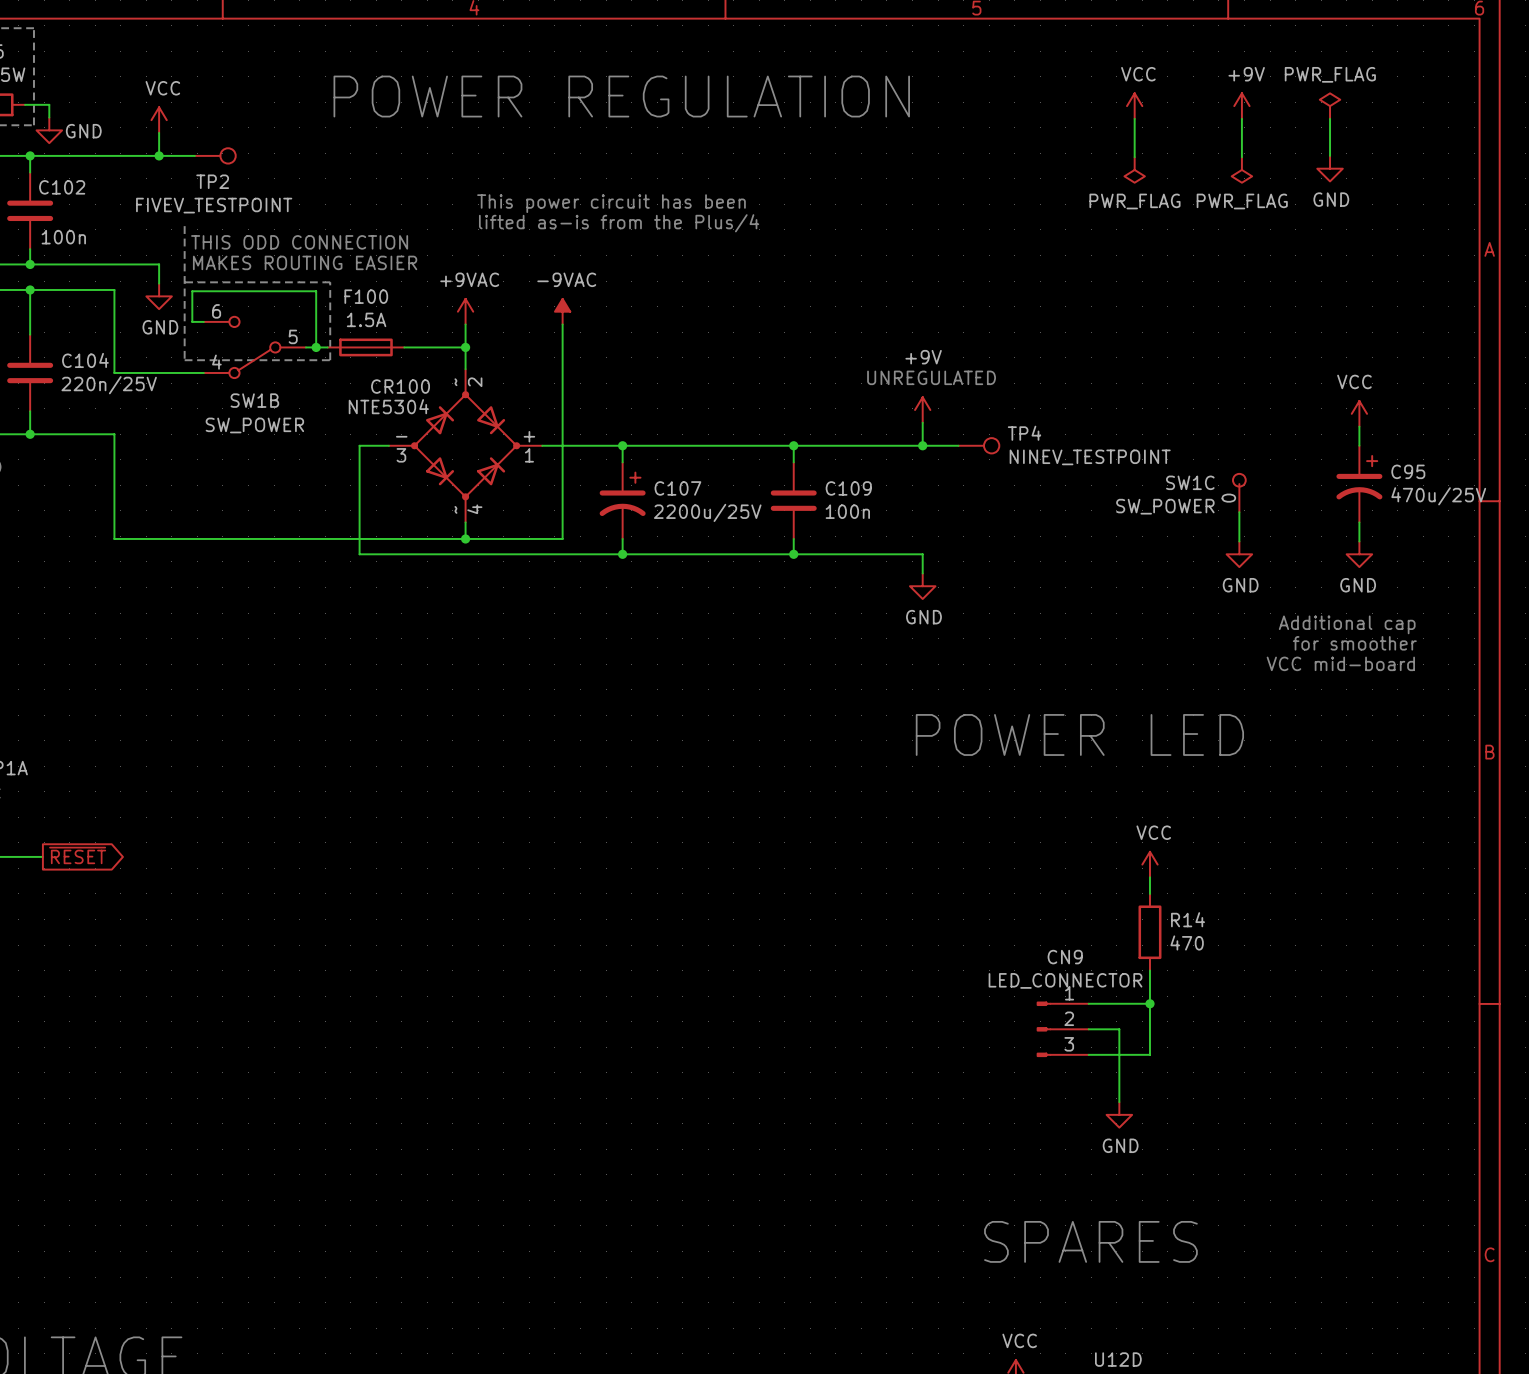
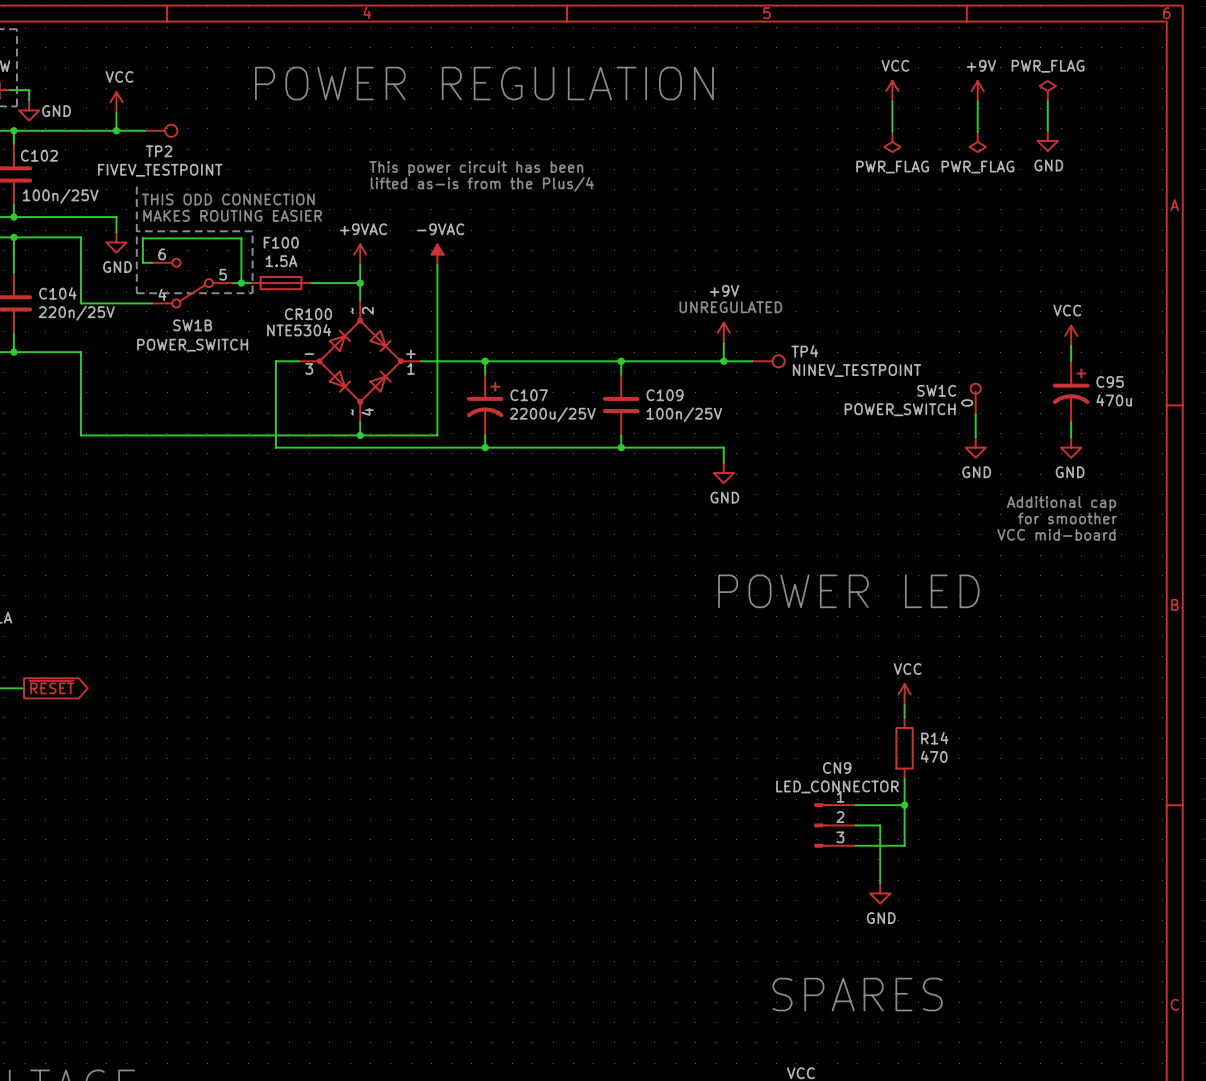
C102 value: 100n (63, 237) -> 100n/25V (60, 196)
SW1B value: SW_POWER (254, 425) -> POWER_SWITCH (192, 345)
C95 value: 470u/25V (1438, 496) -> 470u (1114, 400)
SW1C value: SW_POWER (1165, 506) -> POWER_SWITCH (900, 409)
C109 value: 100n (847, 511) -> 100n/25V (684, 414)

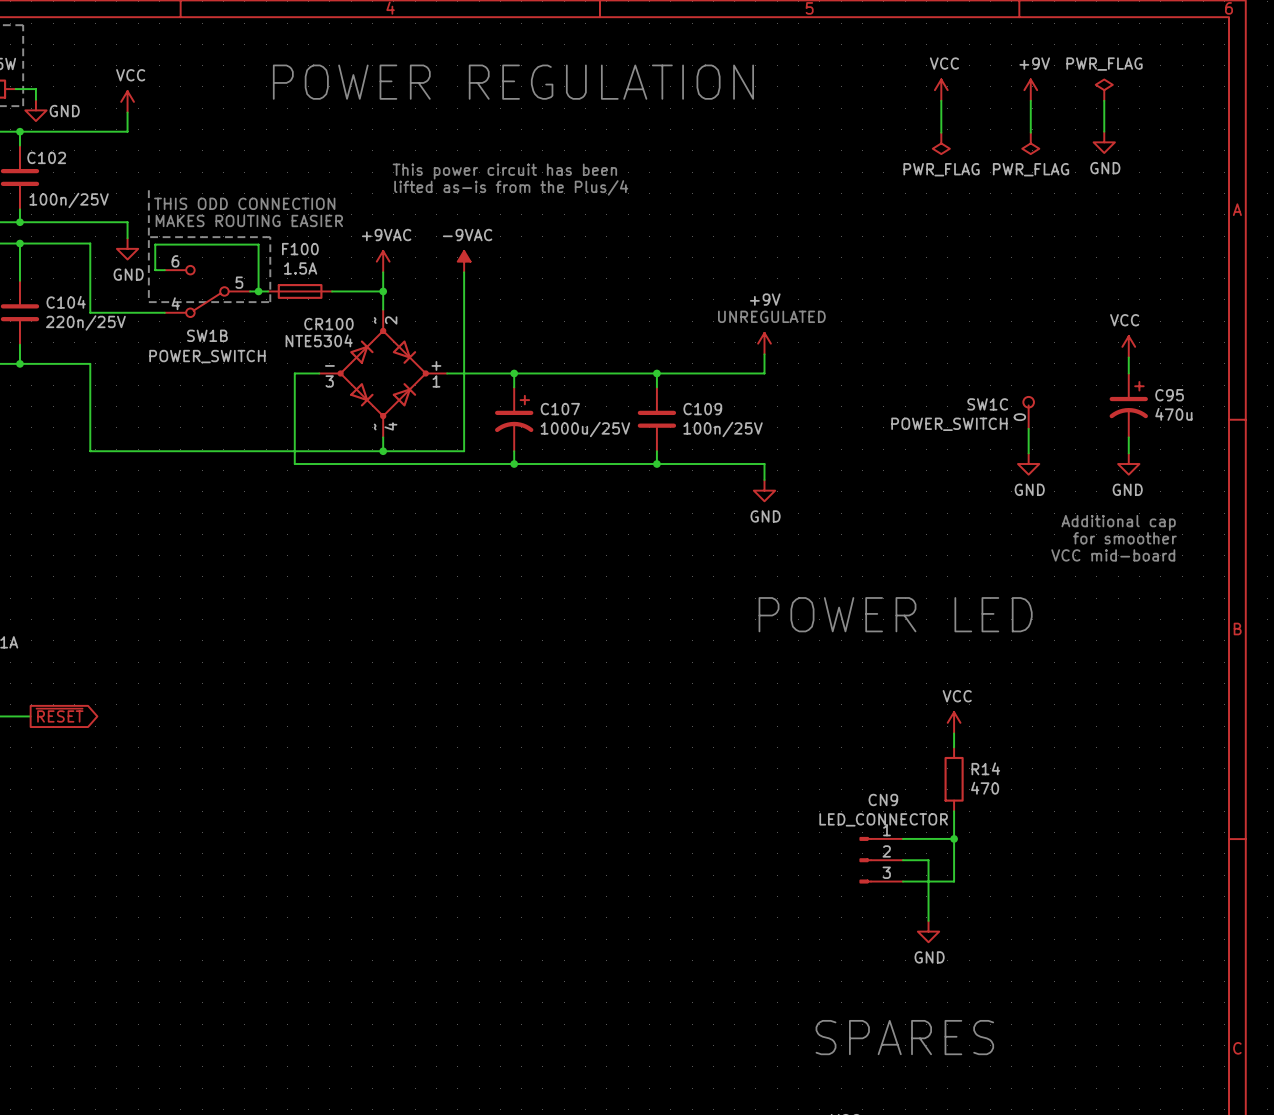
wire: (116, 130) (144, 130) -> none
junction: (116, 130) -> none
TP2: FIVEV_TESTPOINT (161, 130) -> none
wire: (723, 361) (752, 361) -> none
junction: (723, 361) -> none
TP4: NINEV_TESTPOINT (768, 361) -> none
C107 value: 2200u/25V (552, 414) -> 1000u/25V (585, 429)

